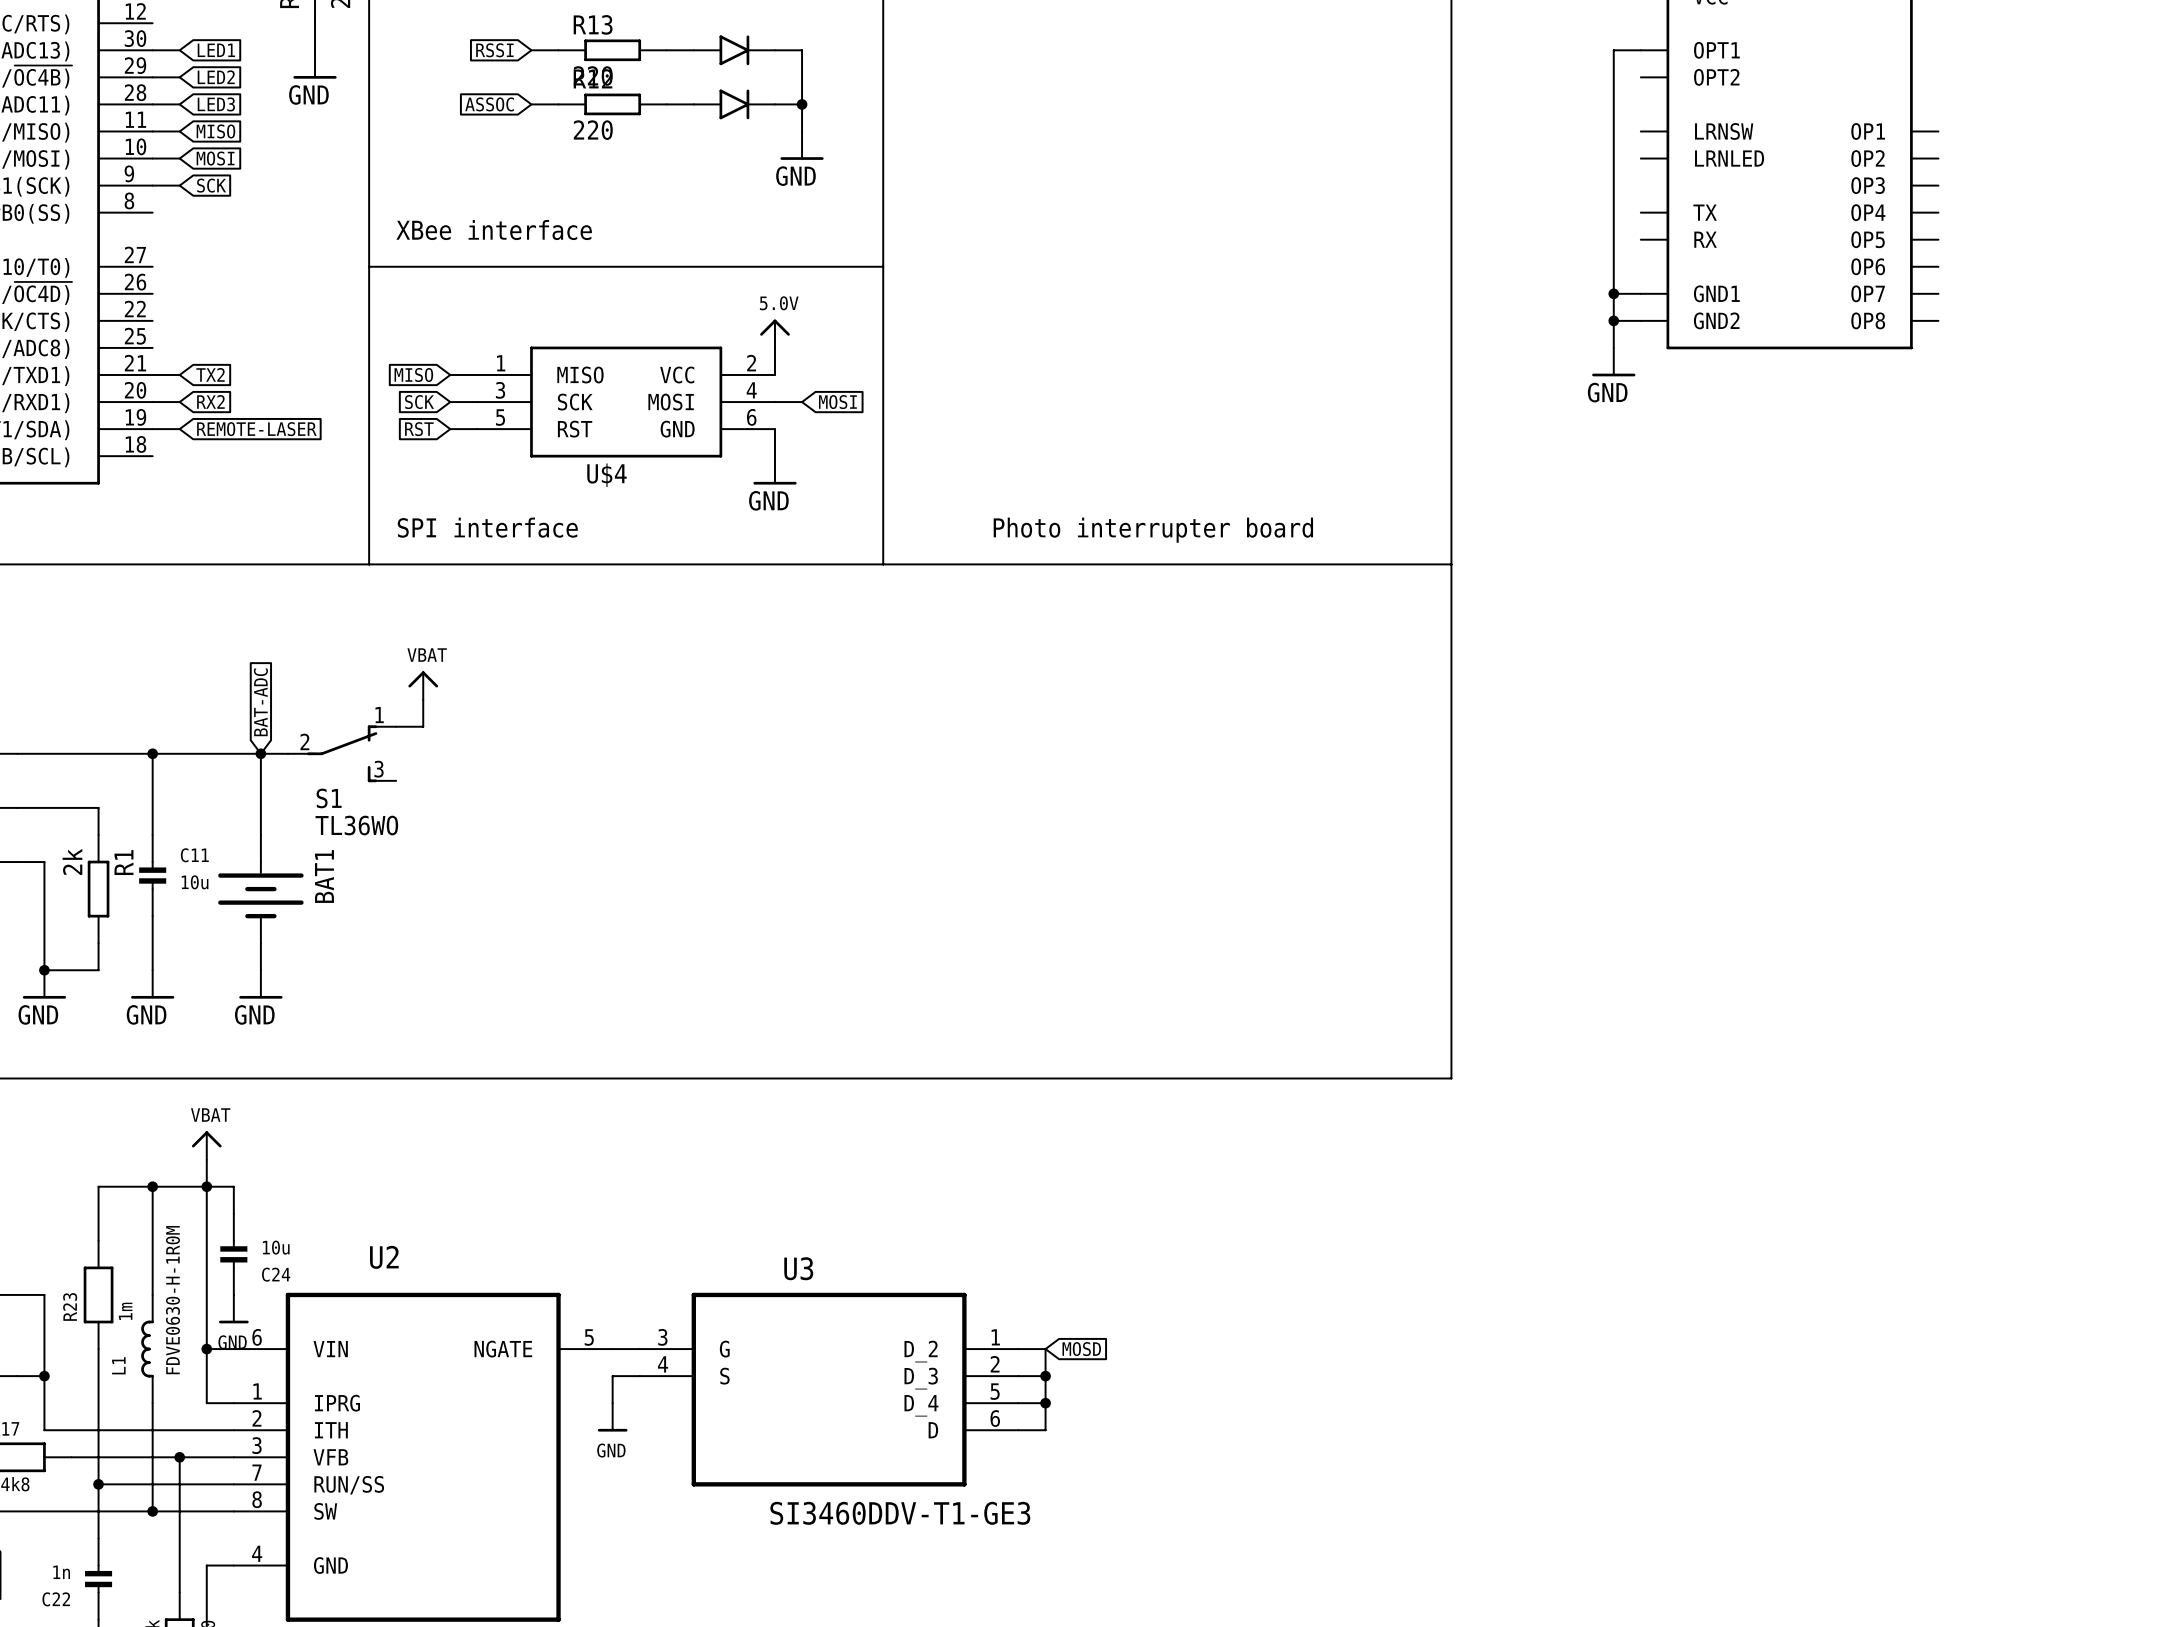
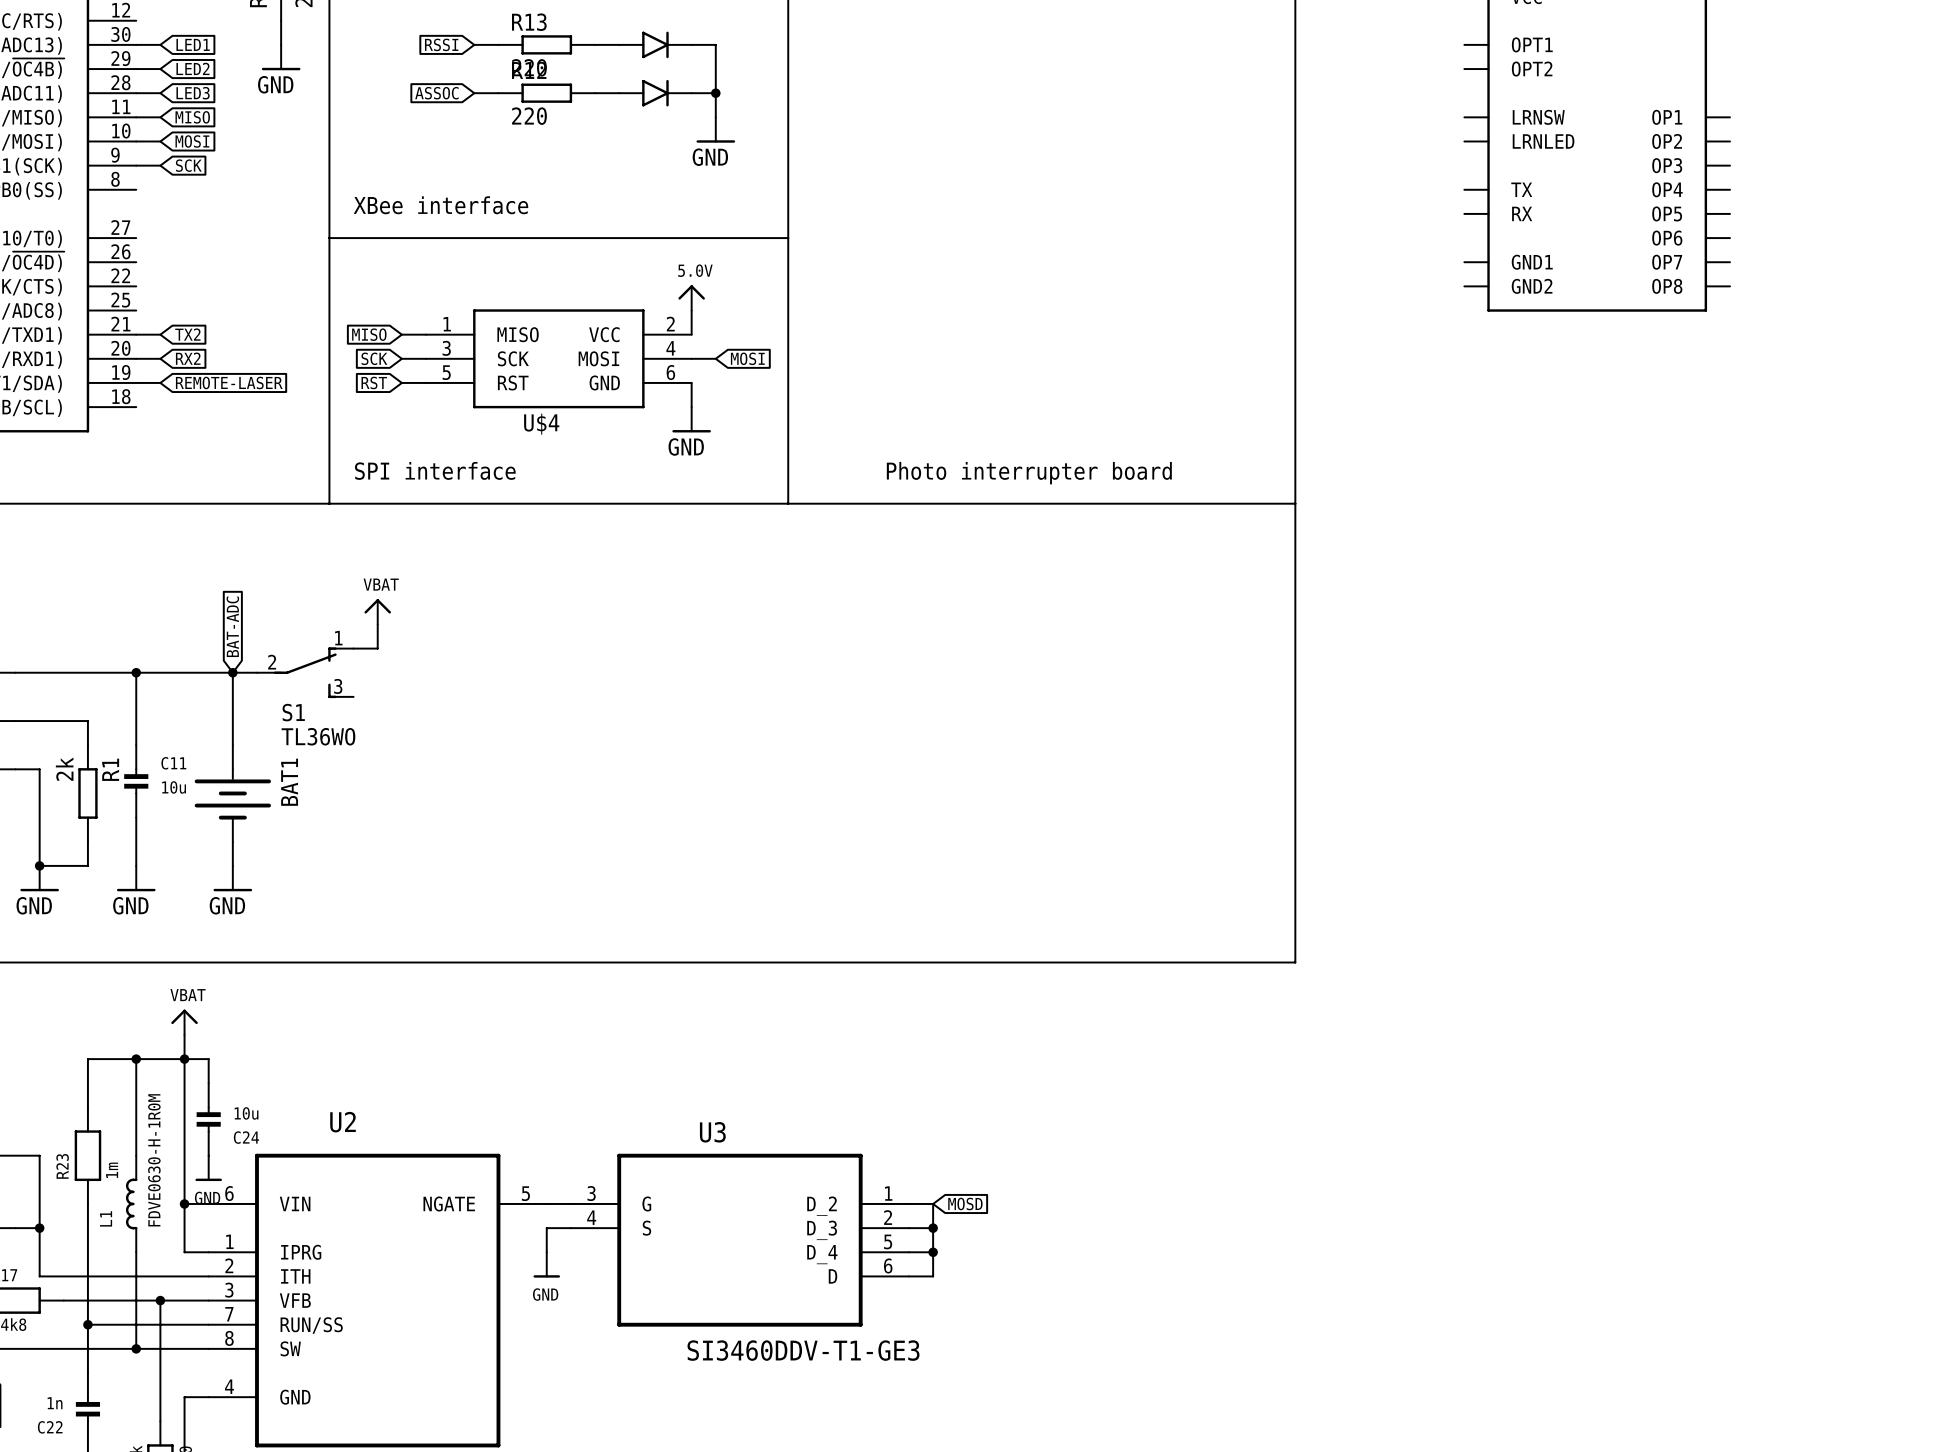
wire: (1640, 50) (1613, 50) (1613, 347) -> none
wire: (1613, 293) (1640, 293) -> none
junction: (1613, 293) -> none
wire: (1613, 320) (1640, 320) -> none
junction: (1613, 320) -> none
power symbol: GND (1613, 362) -> none

